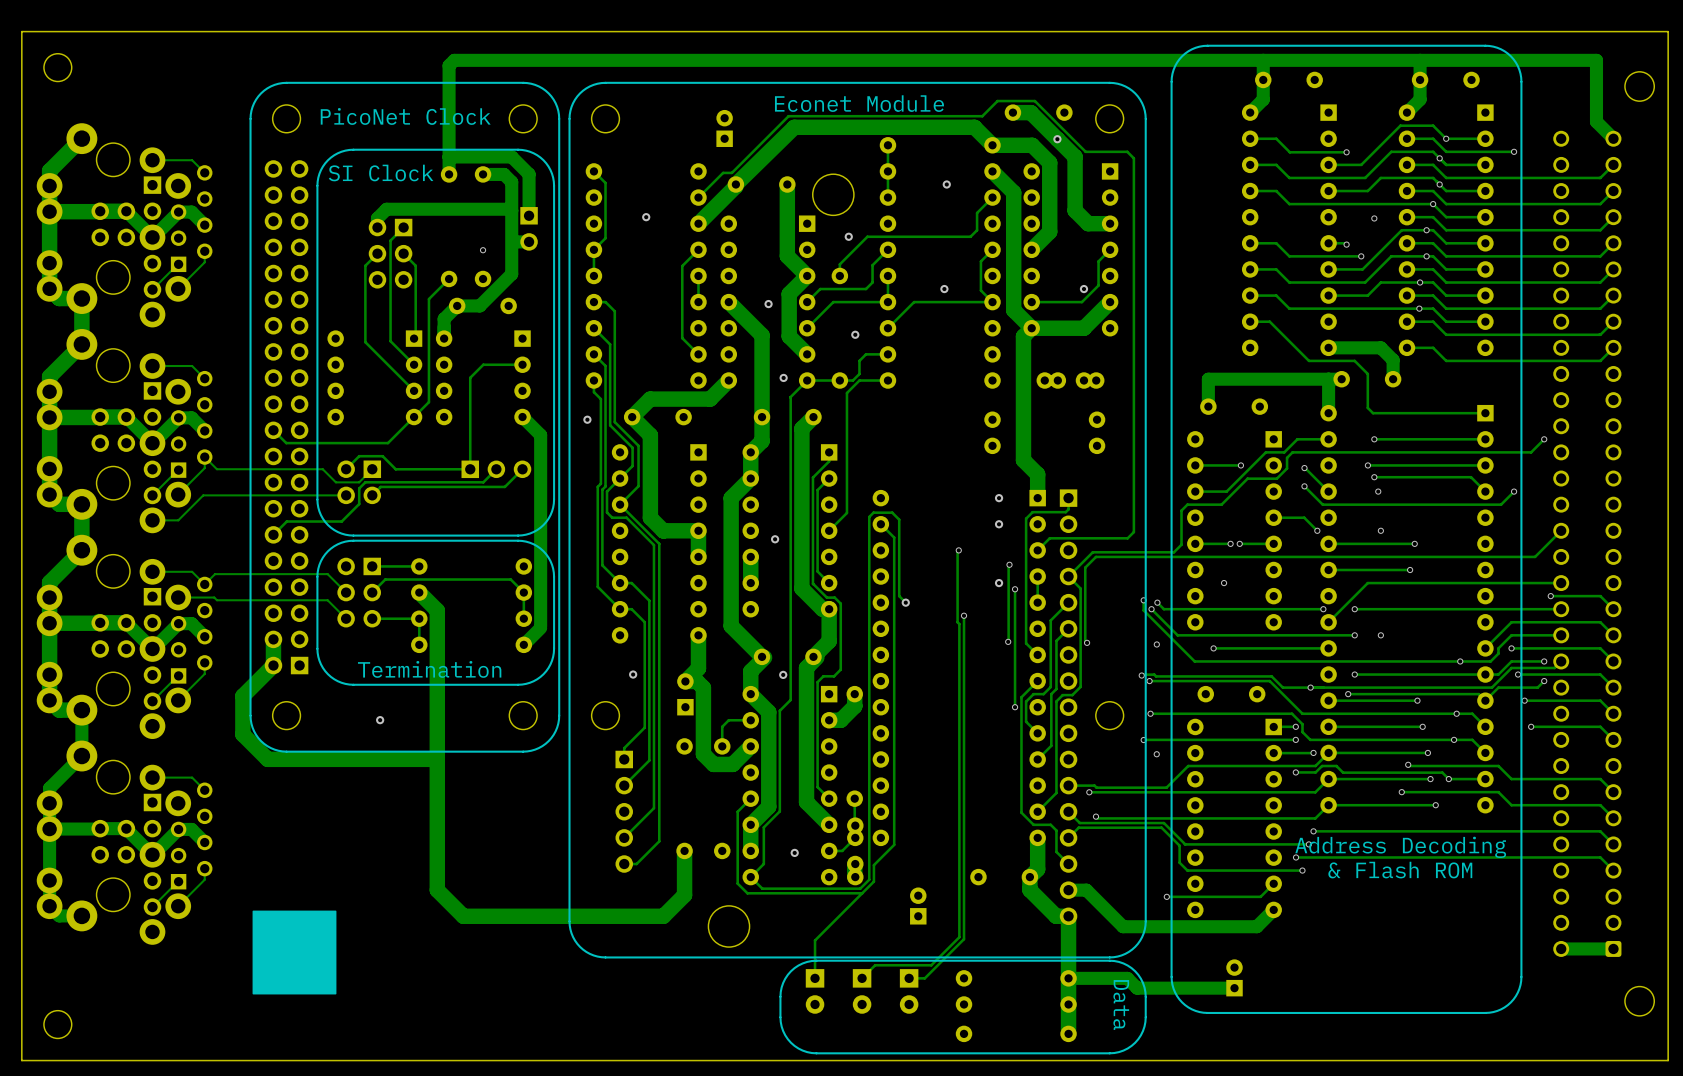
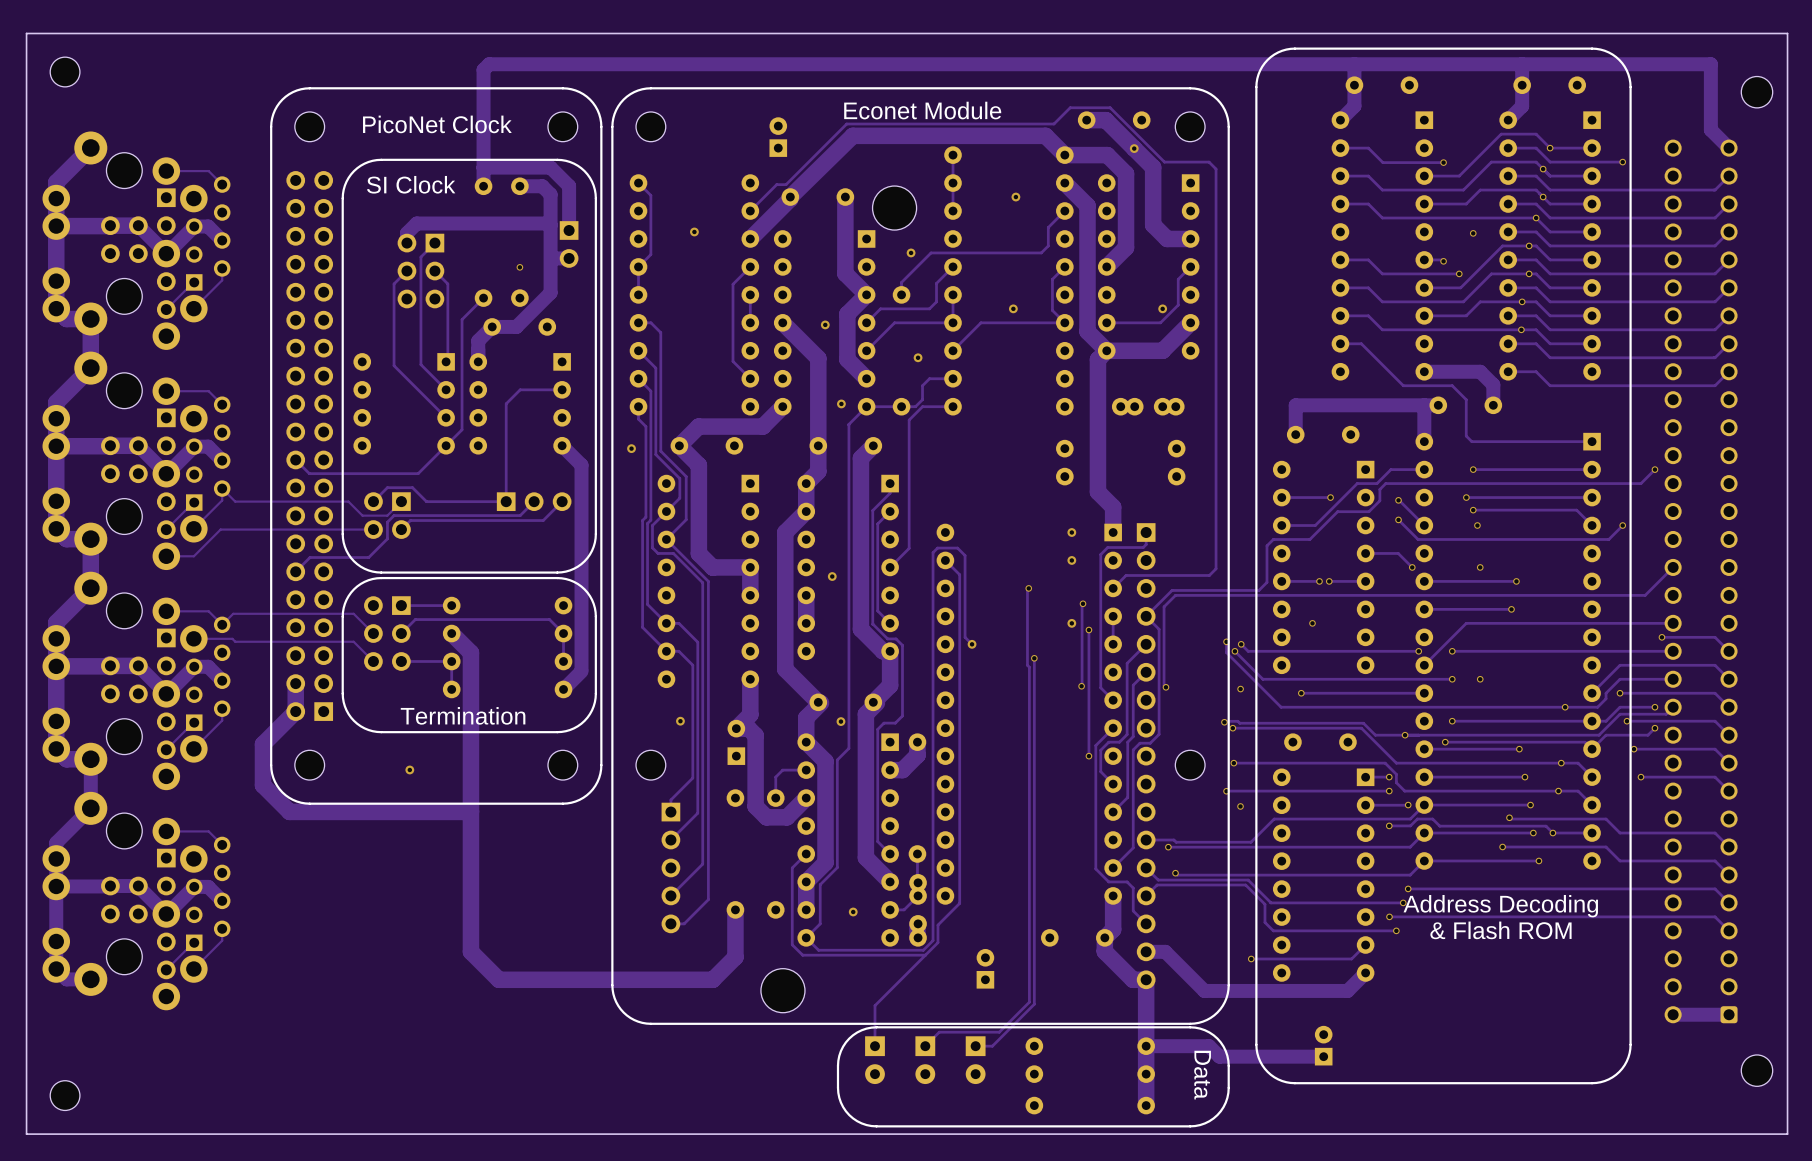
drawing: [252, 910, 337, 995] -> none

